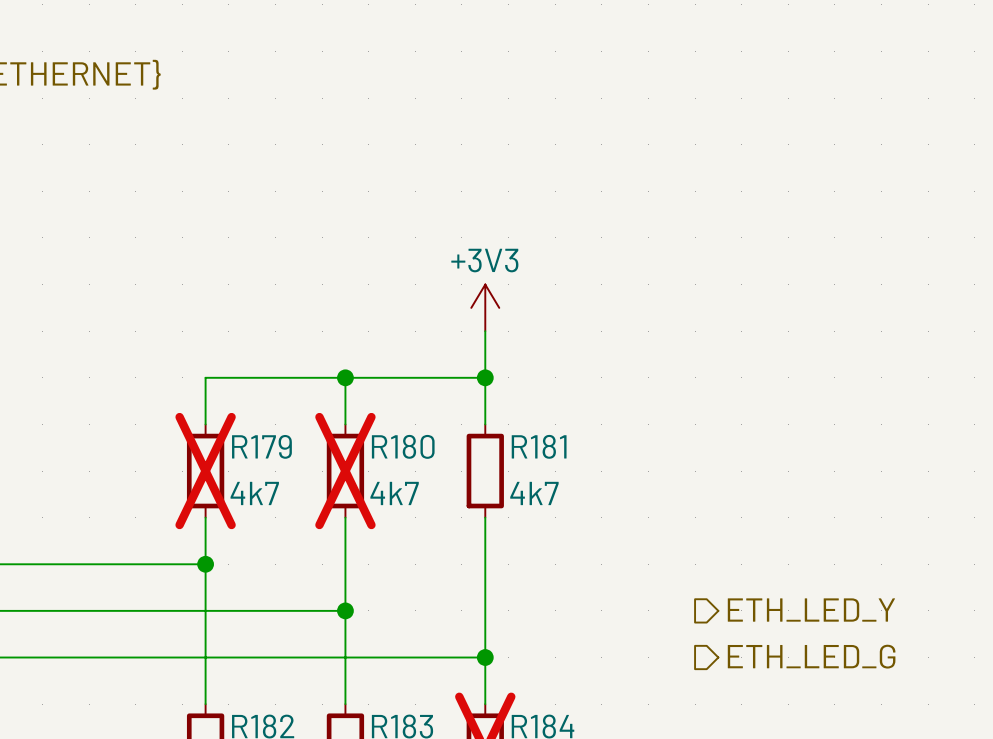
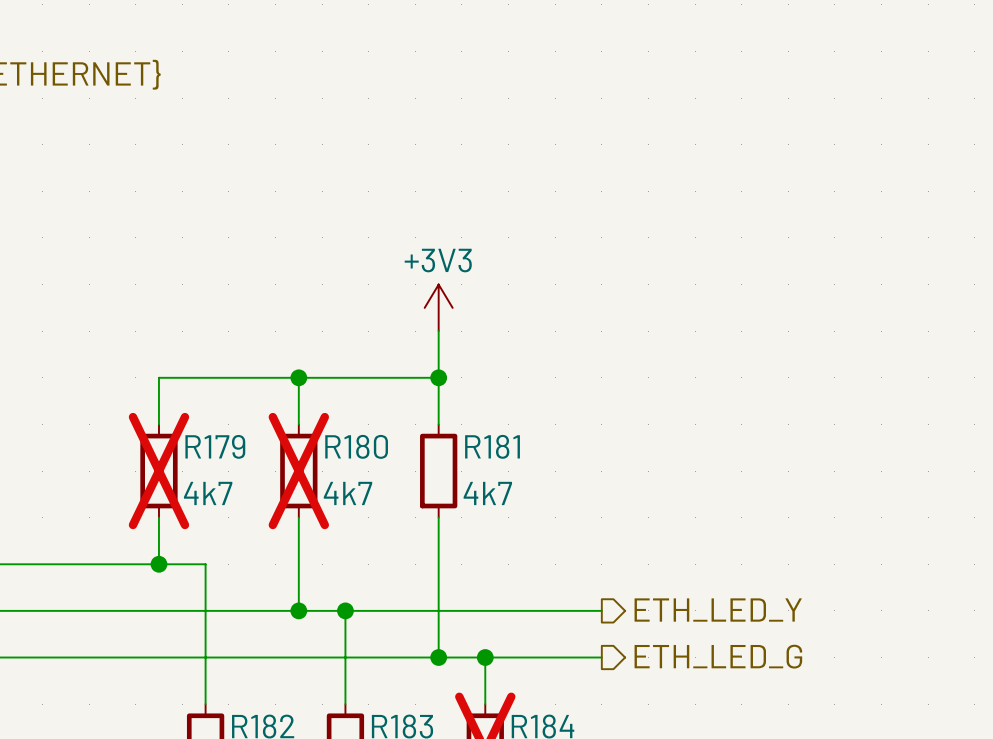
power symbol position: +3V3 (485, 307) -> +3V3 (438, 307)
wire: (485, 331) (485, 424) -> (438, 331) (438, 424)
wire: (205, 377) (205, 424) -> (205, 377) (158, 377) (158, 424)
junction: none -> (298, 377)
wire: (345, 377) (345, 424) -> (298, 377) (298, 424)
junction: (345, 377) -> none
wire: (438, 377) (485, 377) -> none
junction: none -> (438, 377)
junction: (485, 377) -> none
R179 position: (205, 471) -> (158, 471)
R180 position: (345, 471) -> (298, 471)
R181 position: (485, 471) -> (438, 471)
wire: (205, 517) (205, 564) -> (158, 517) (158, 564)
wire: none -> (298, 517) (298, 610)
wire: (345, 517) (345, 610) -> (601, 610) (345, 610)
wire: none -> (438, 517) (438, 657)
wire: (485, 517) (485, 657) -> (601, 657) (485, 657)
junction position: (205, 564) -> (158, 564)
junction: none -> (298, 610)
hierarchical label position: ETH_LED_Y (811, 610) -> ETH_LED_Y (718, 610)
hierarchical label position: ETH_LED_G (811, 656) -> ETH_LED_G (718, 656)
junction: none -> (438, 657)

